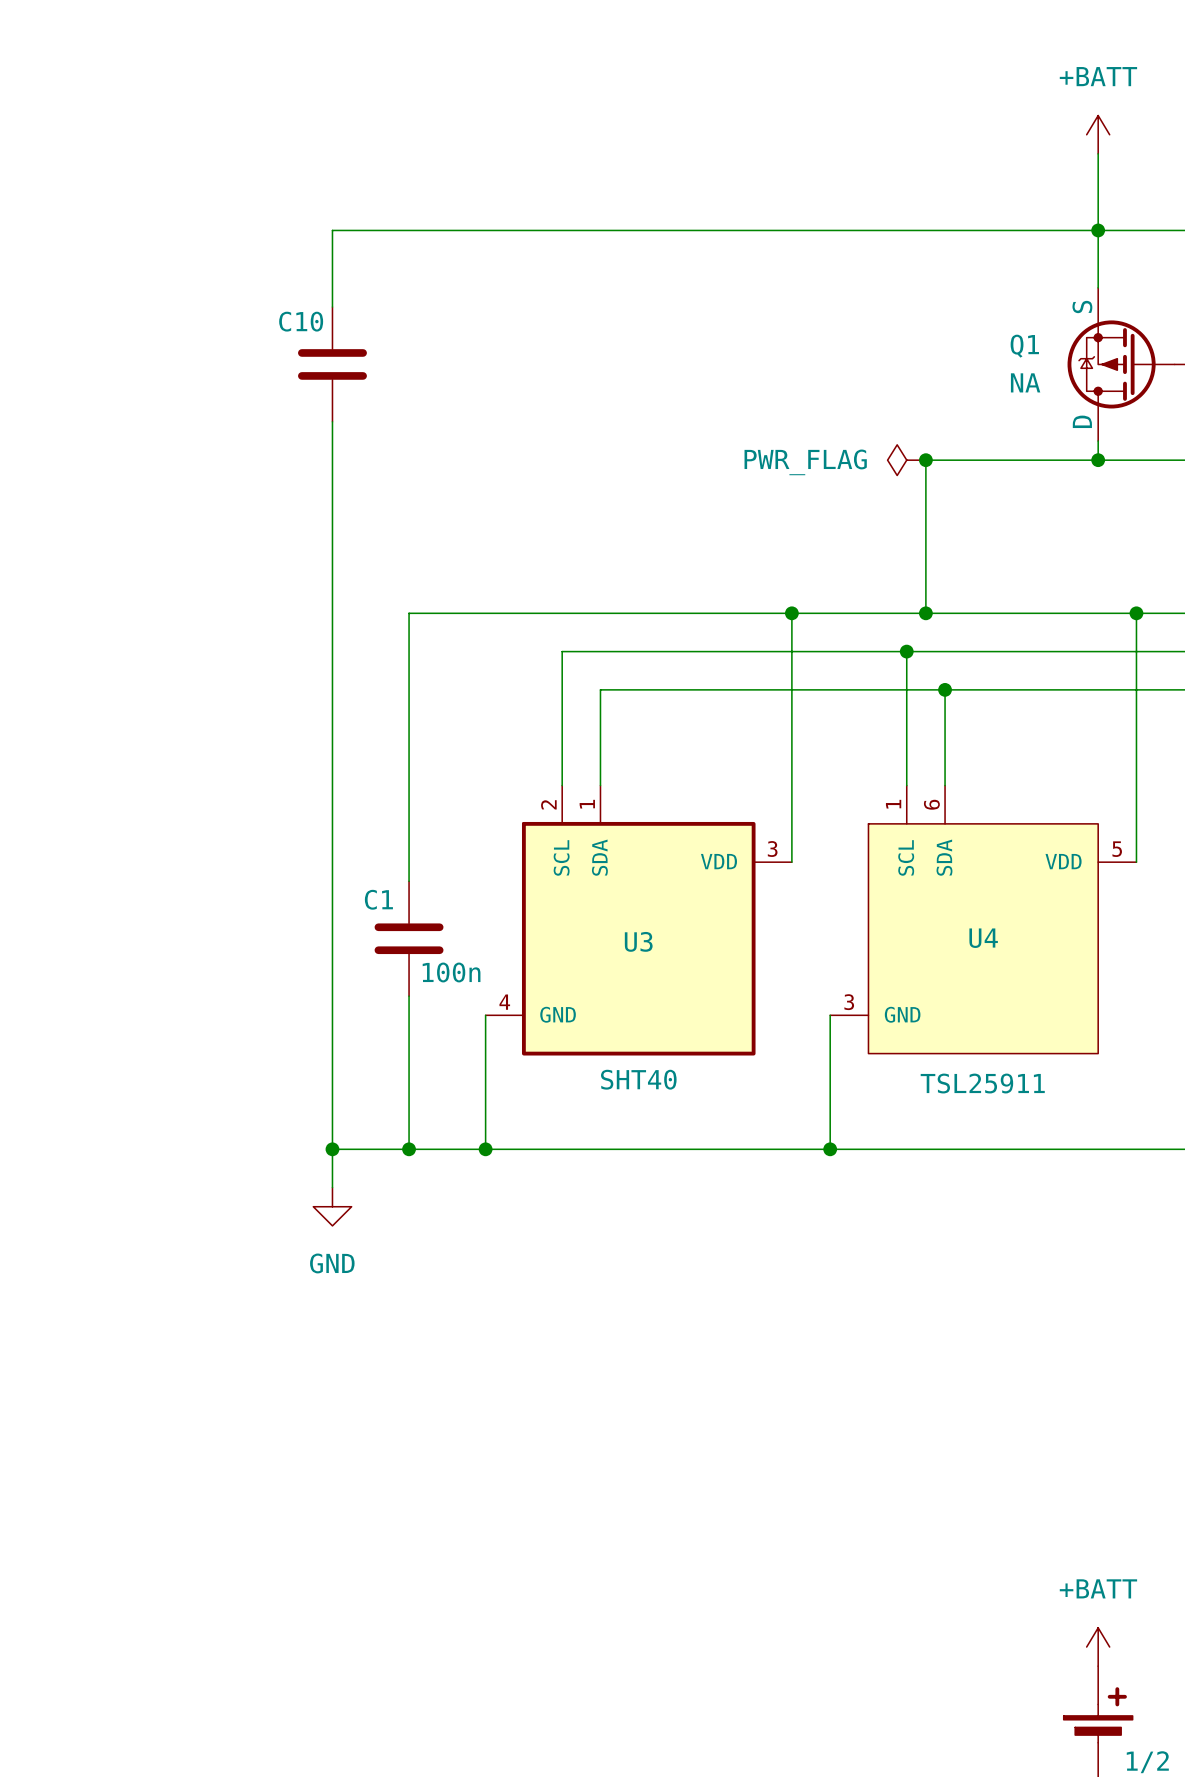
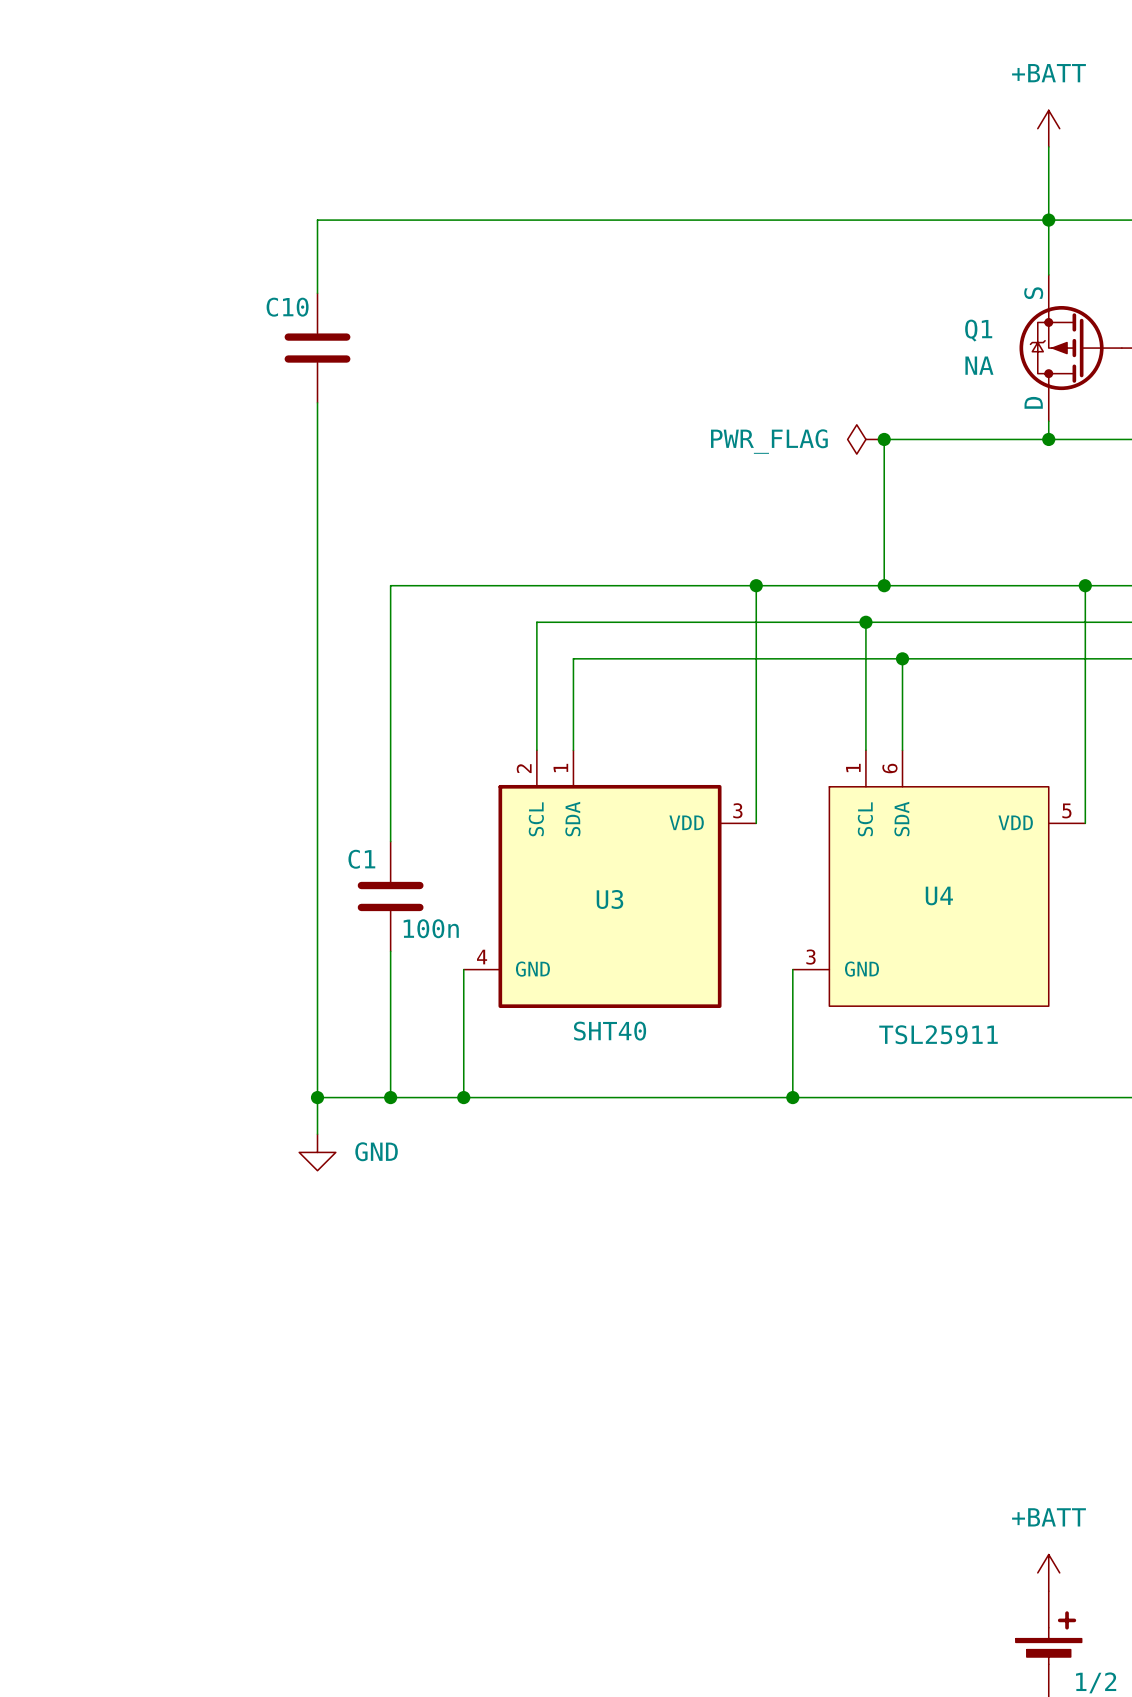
power symbol text position: GND (332, 1263) -> GND (376, 1151)

